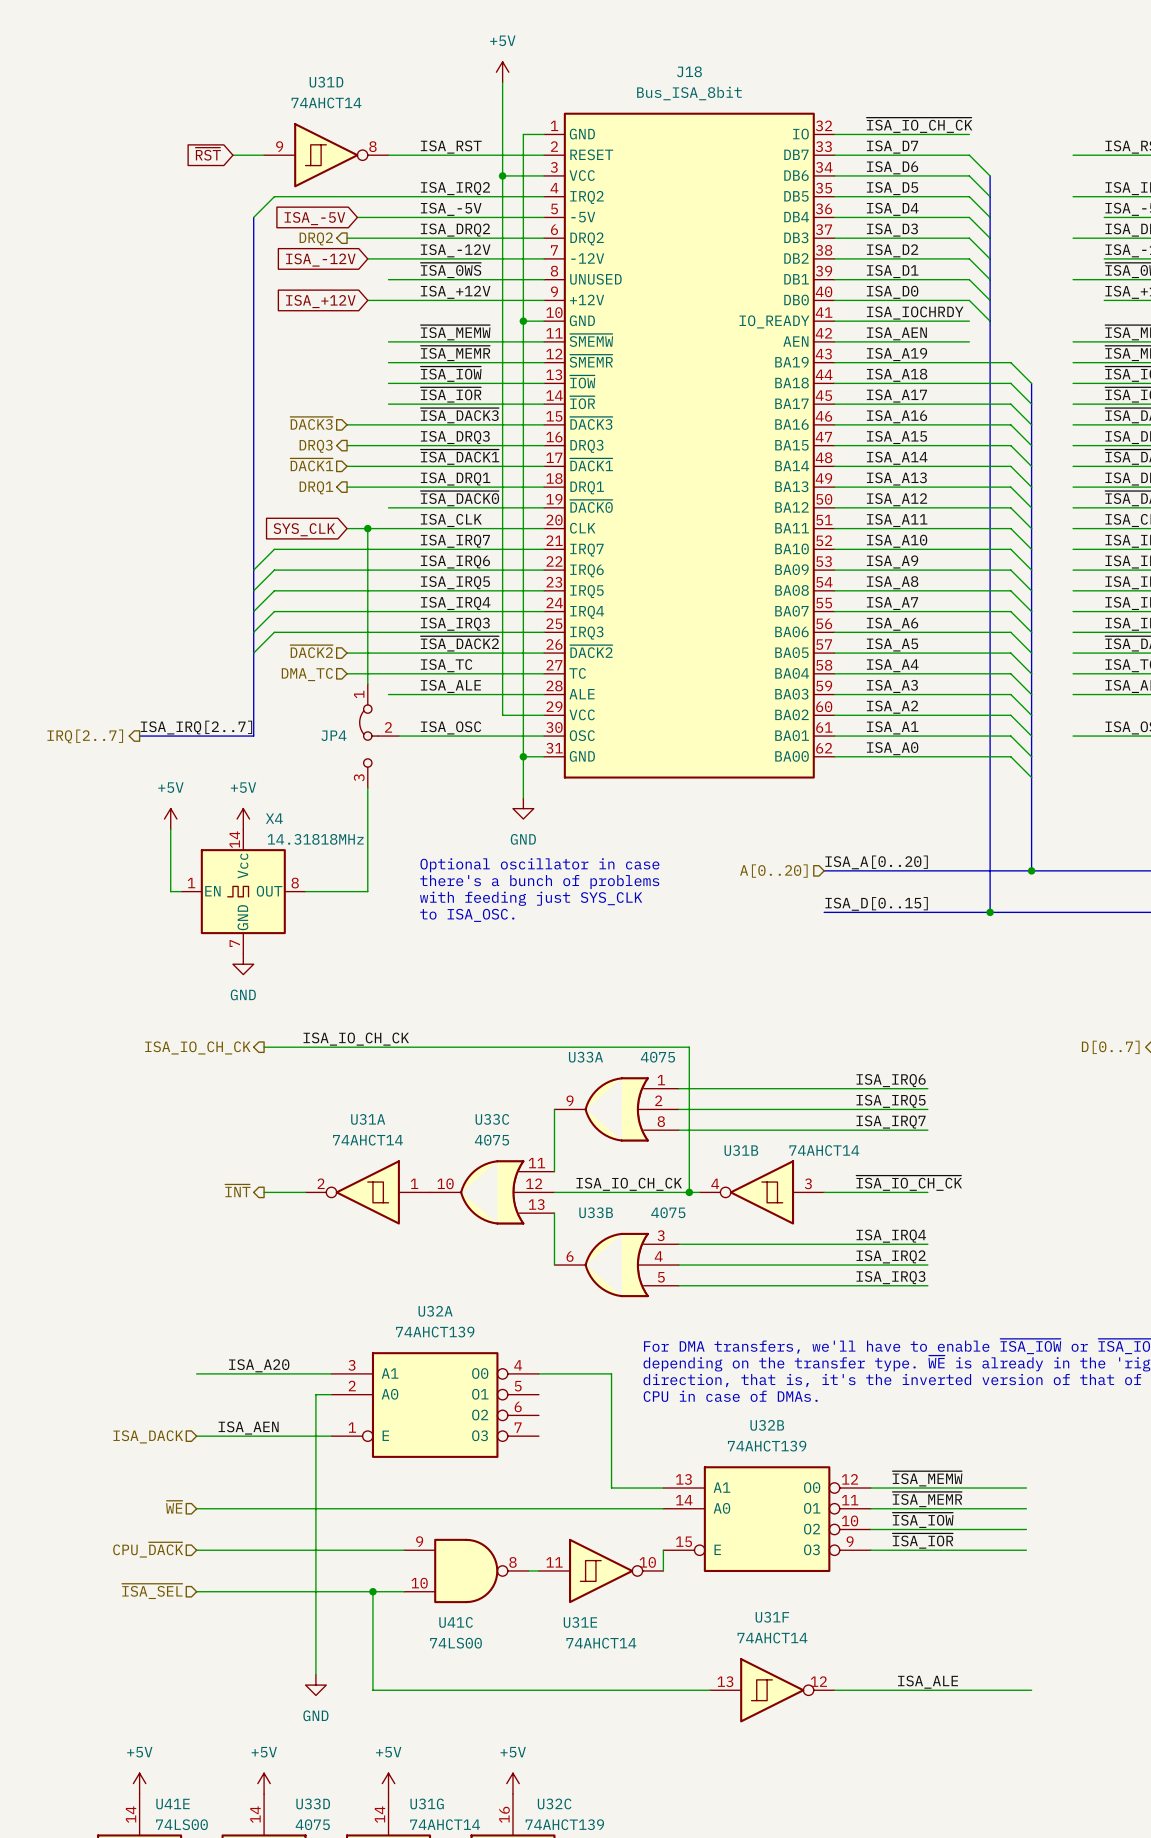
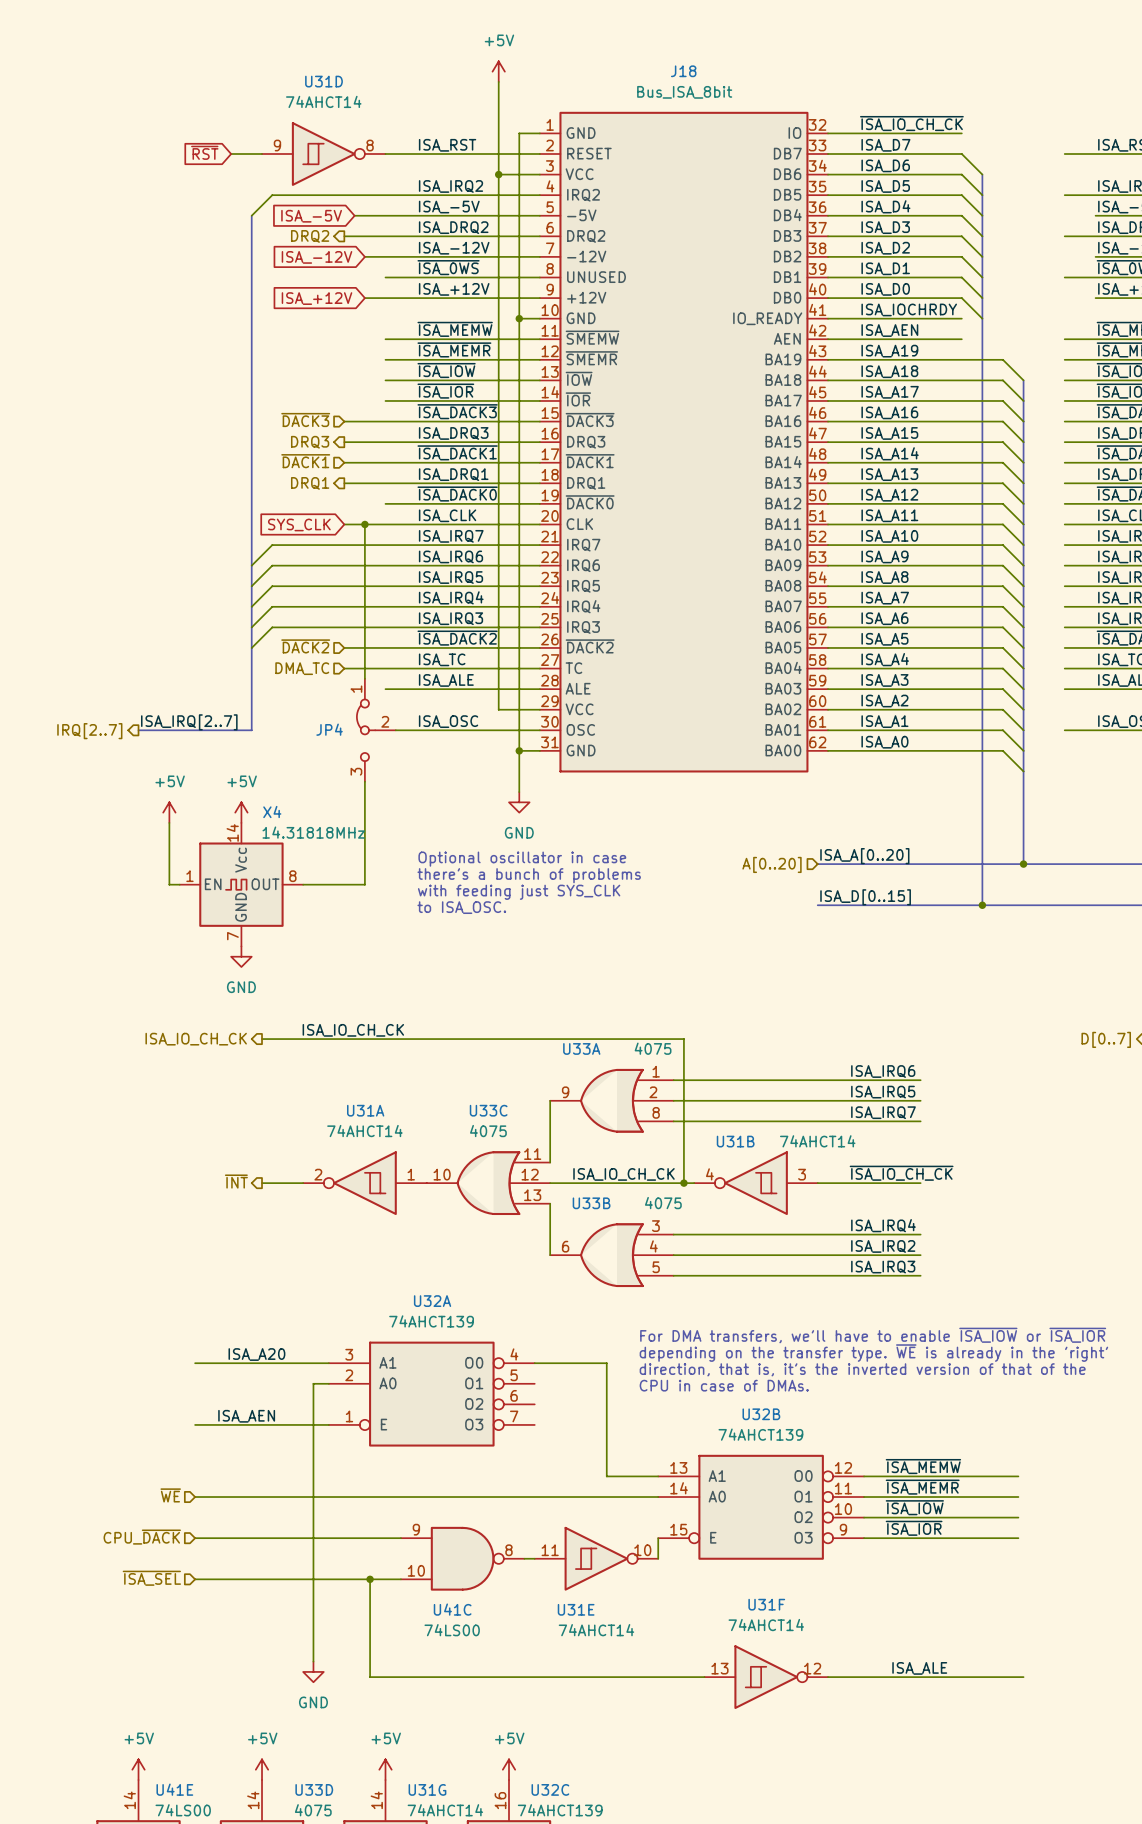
hierarchical label: ISA_DACK (148, 1436) -> none

